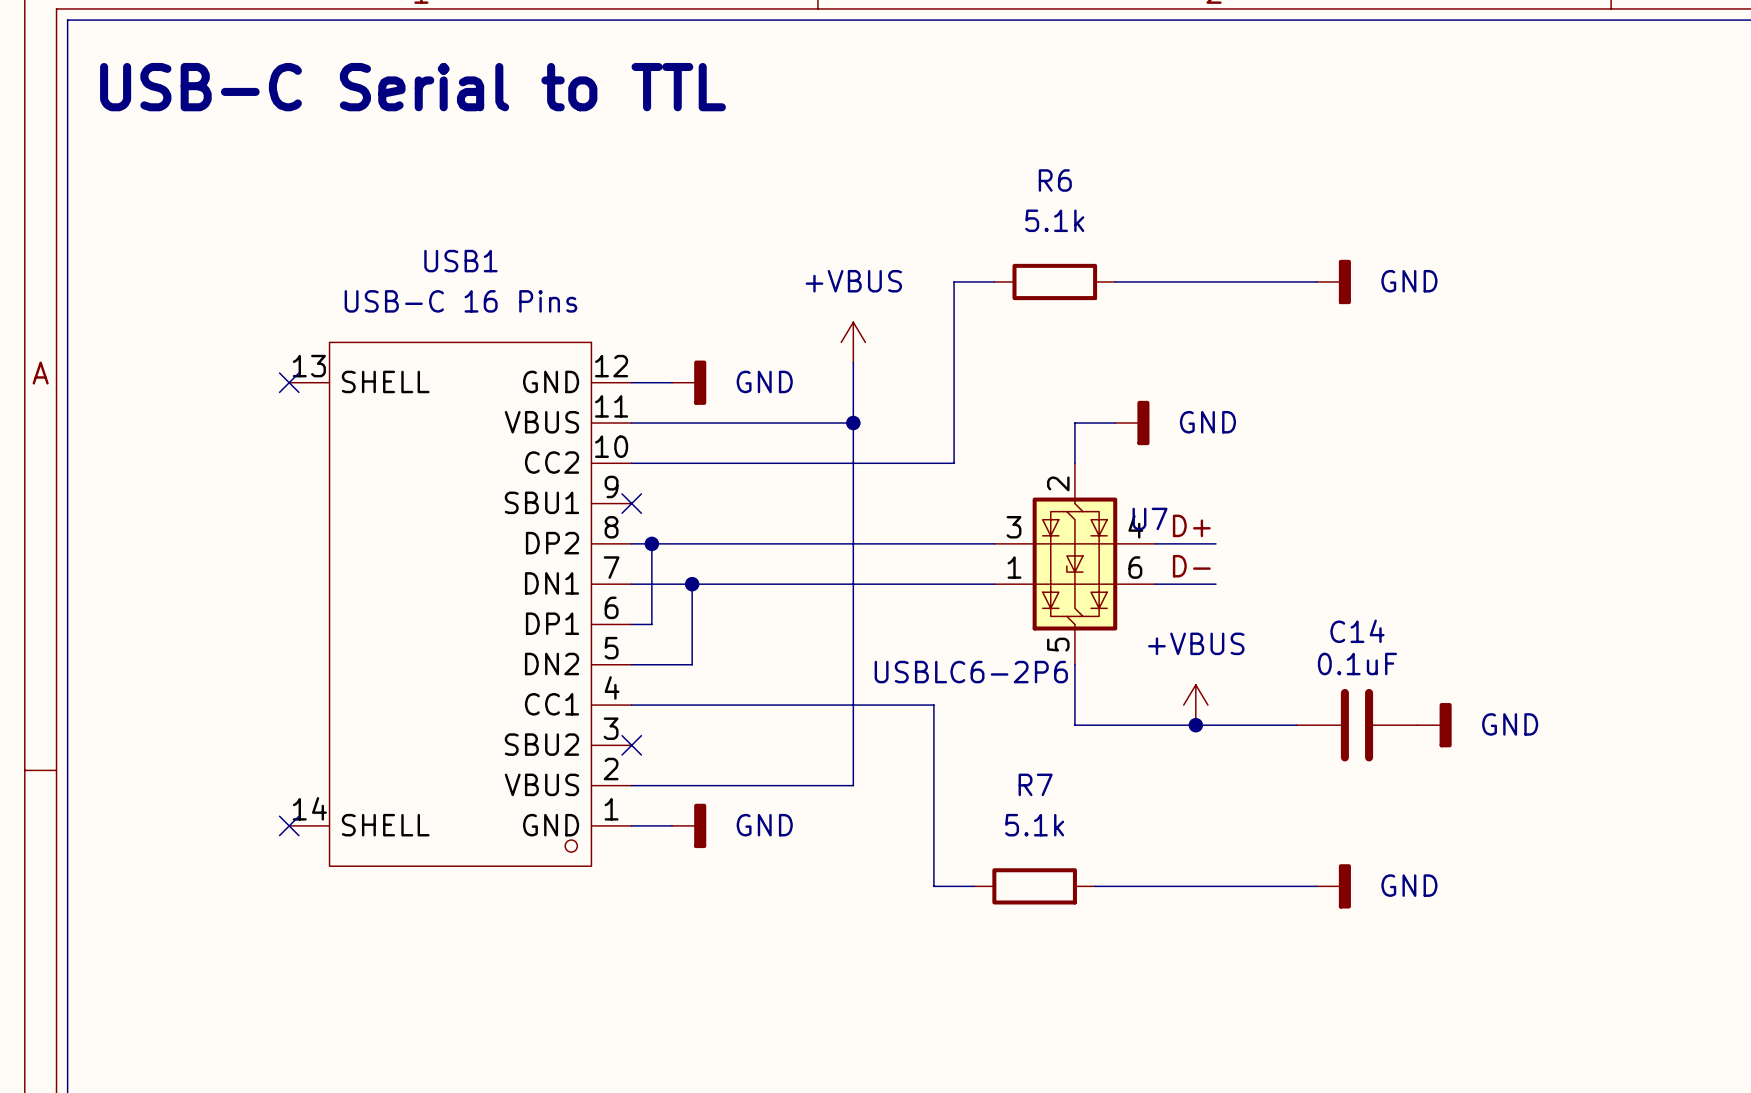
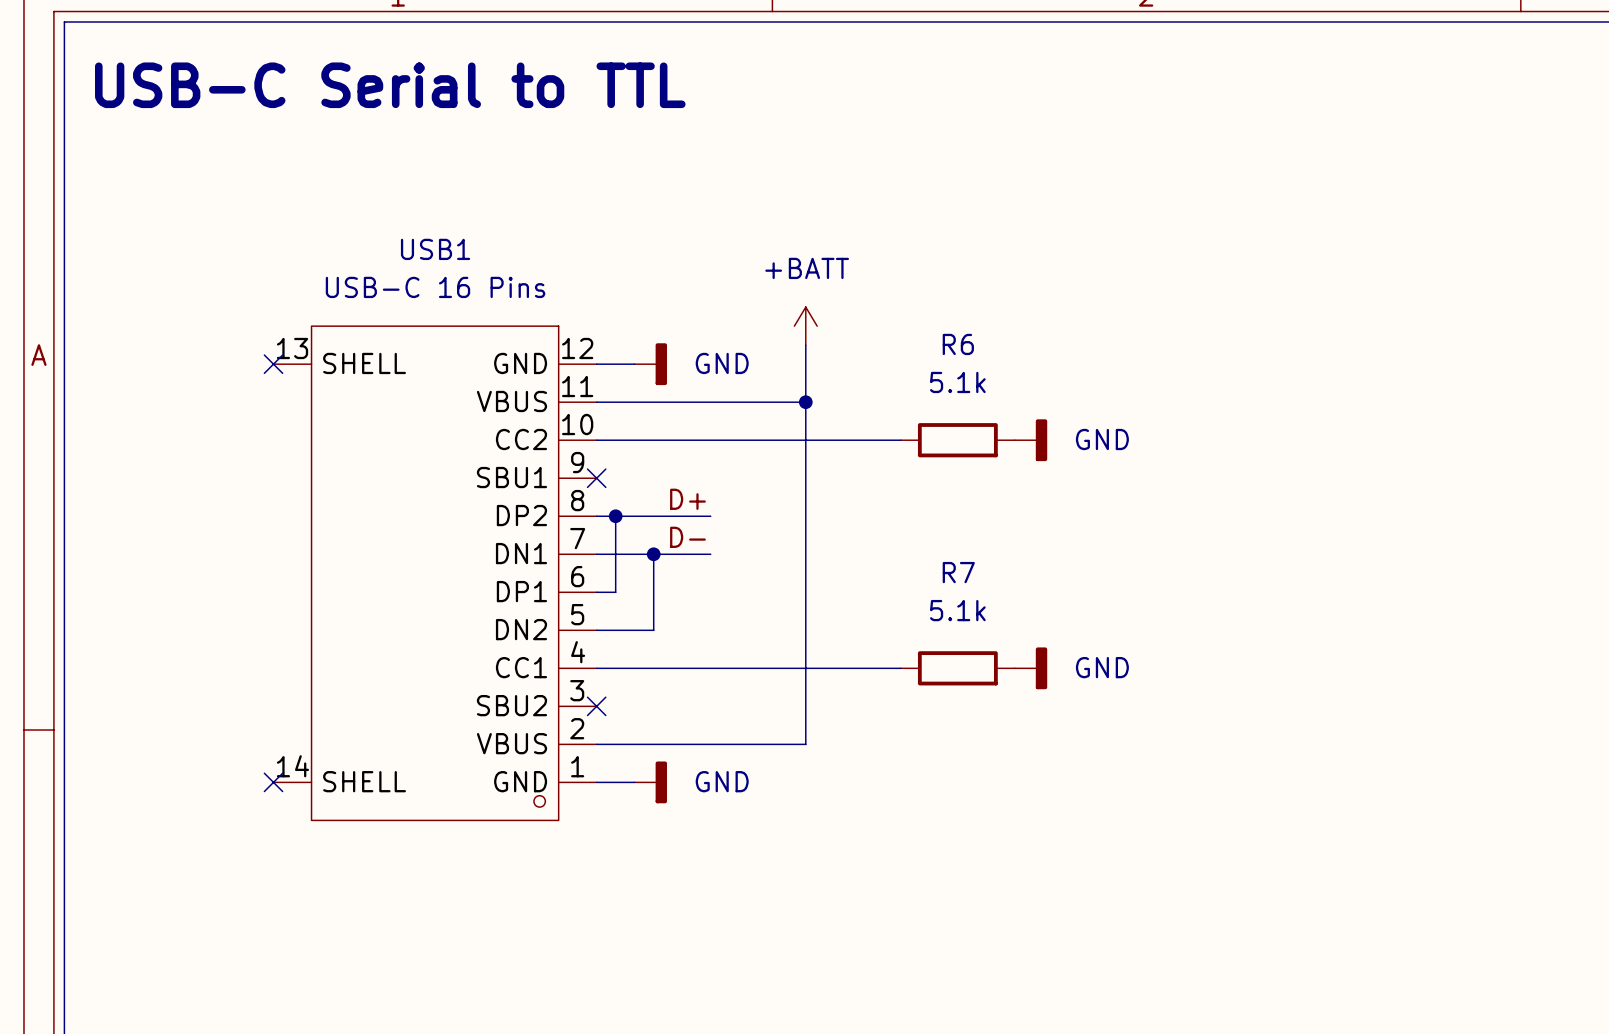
wire: (994, 281) (954, 281) (954, 463) -> none
R6 position: (1054, 281) -> (957, 440)
wire: (1115, 281) (1316, 281) -> none
power symbol: GND (1333, 281) -> none
power symbol: +VBUS (853, 342) -> +BATT (805, 326)
wire: (1115, 423) (1074, 423) (1074, 463) -> none
power symbol position: GND (1132, 423) -> GND (1031, 440)
label: none -> D+ (687, 499)
label: D+ (1191, 525) -> none
wire: (752, 543) (994, 543) -> none
wire: (1155, 543) (1215, 543) -> none
U7: USBLC6-2P6 (1074, 564) -> none
label: none -> D- (687, 537)
label: D- (1191, 566) -> none
wire: (752, 584) (994, 584) -> none
wire: (1155, 584) (1215, 584) -> none
wire: (1074, 664) (1074, 725) (1296, 725) -> none
wire: (933, 705) (933, 886) (974, 886) -> (881, 668) (900, 668)
power symbol: none -> GND (1031, 668)
power symbol: +VBUS (1195, 705) -> none
junction: (1195, 725) -> none
C14: 0.1uF (1356, 725) -> none
power symbol: GND (1434, 725) -> none
R7 position: (1034, 886) -> (957, 668)
wire: (1095, 886) (1316, 886) -> none
power symbol: GND (1333, 886) -> none

